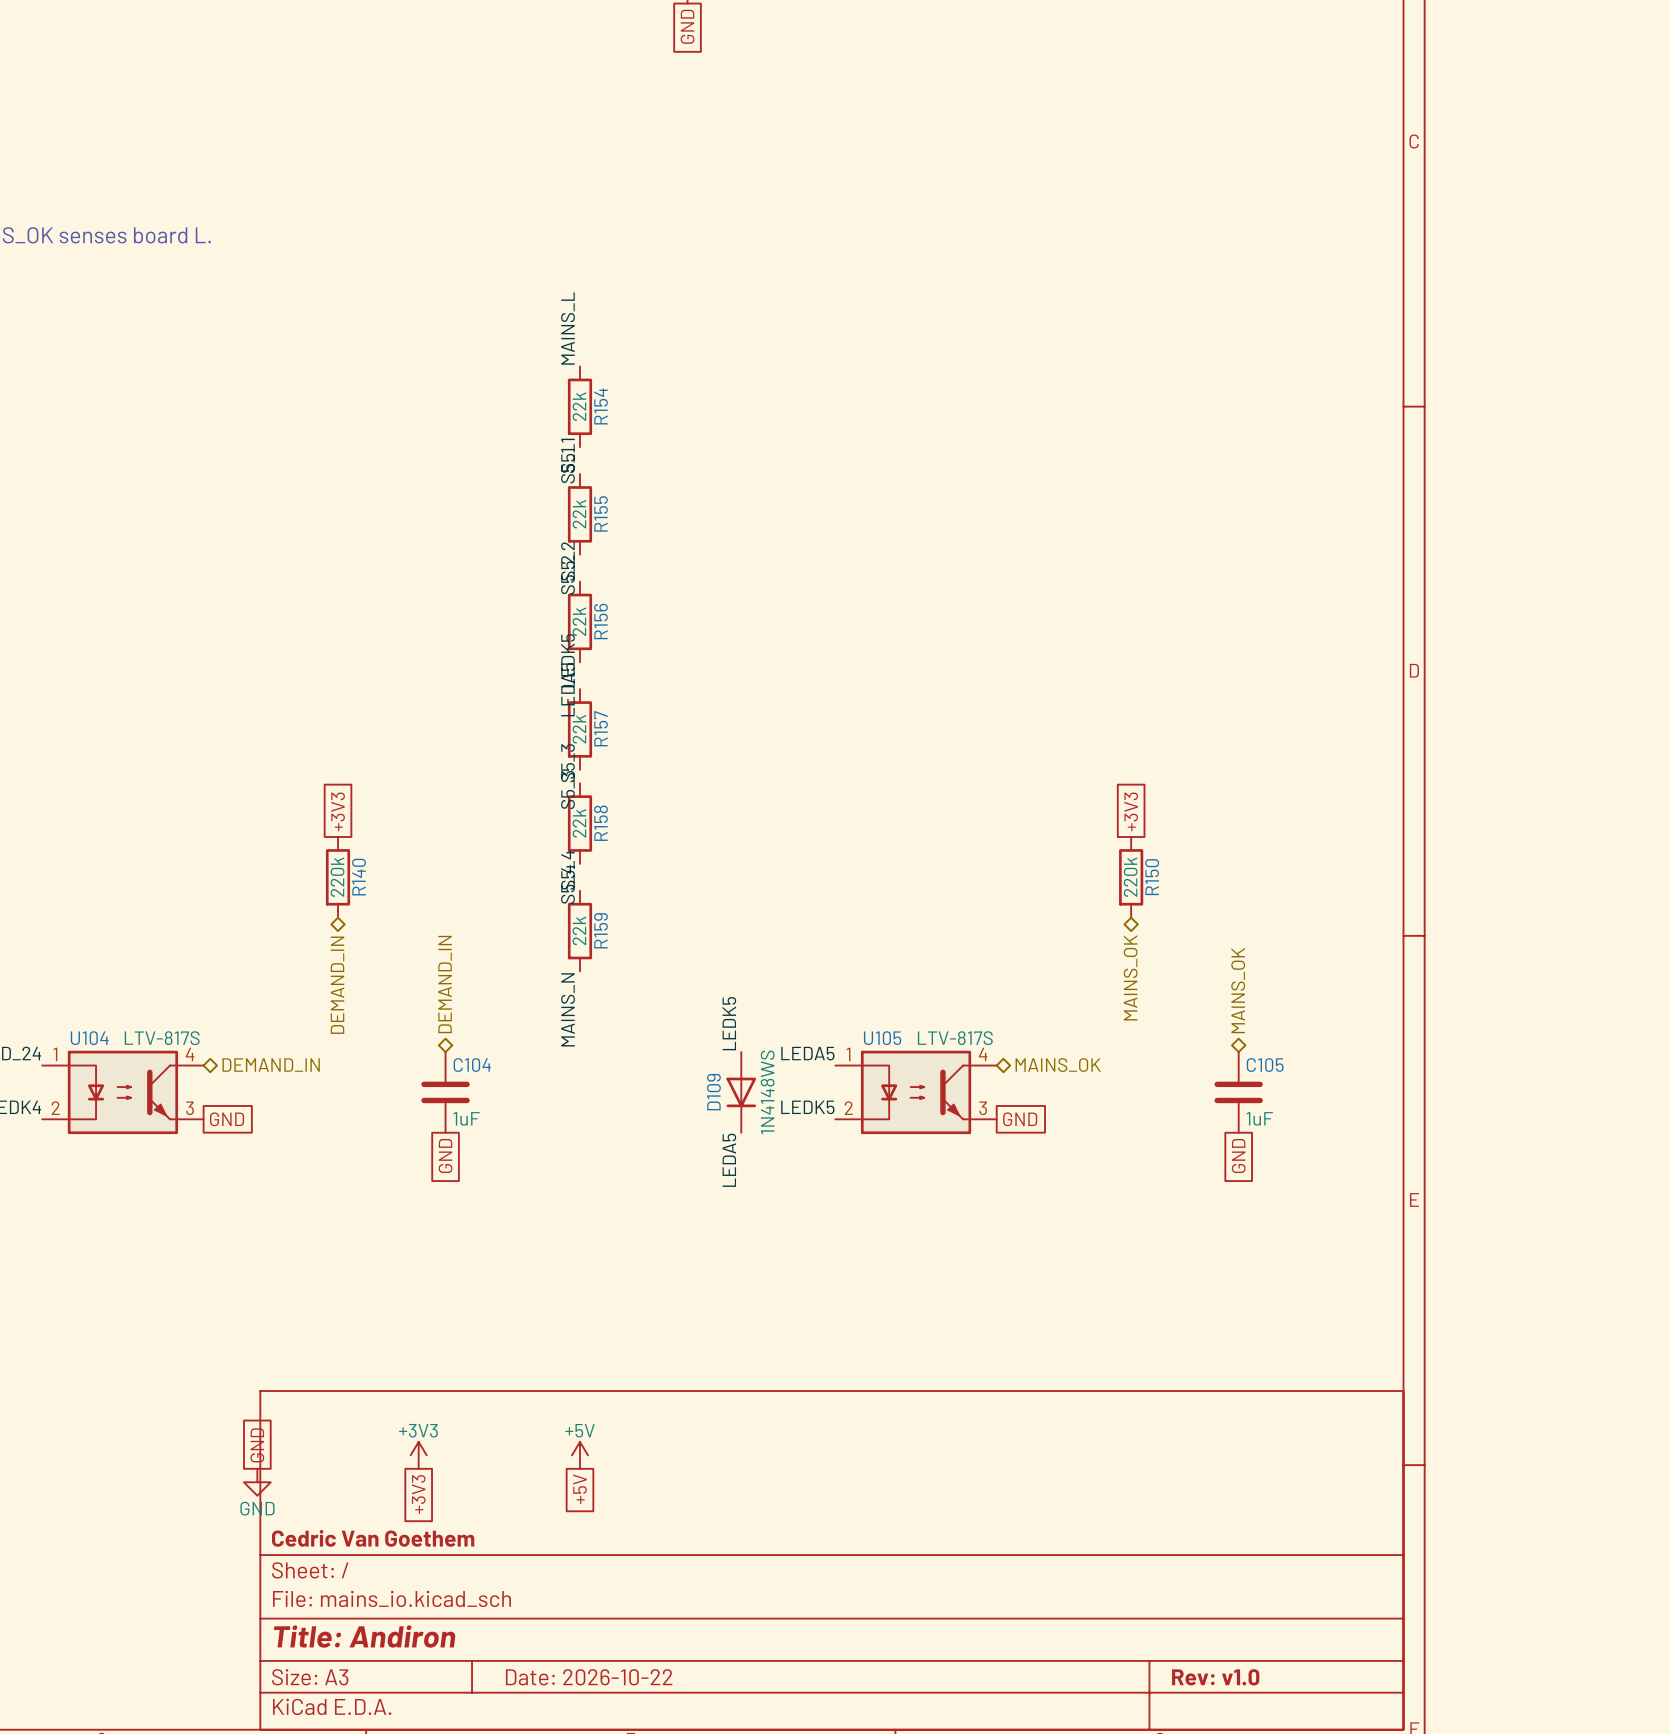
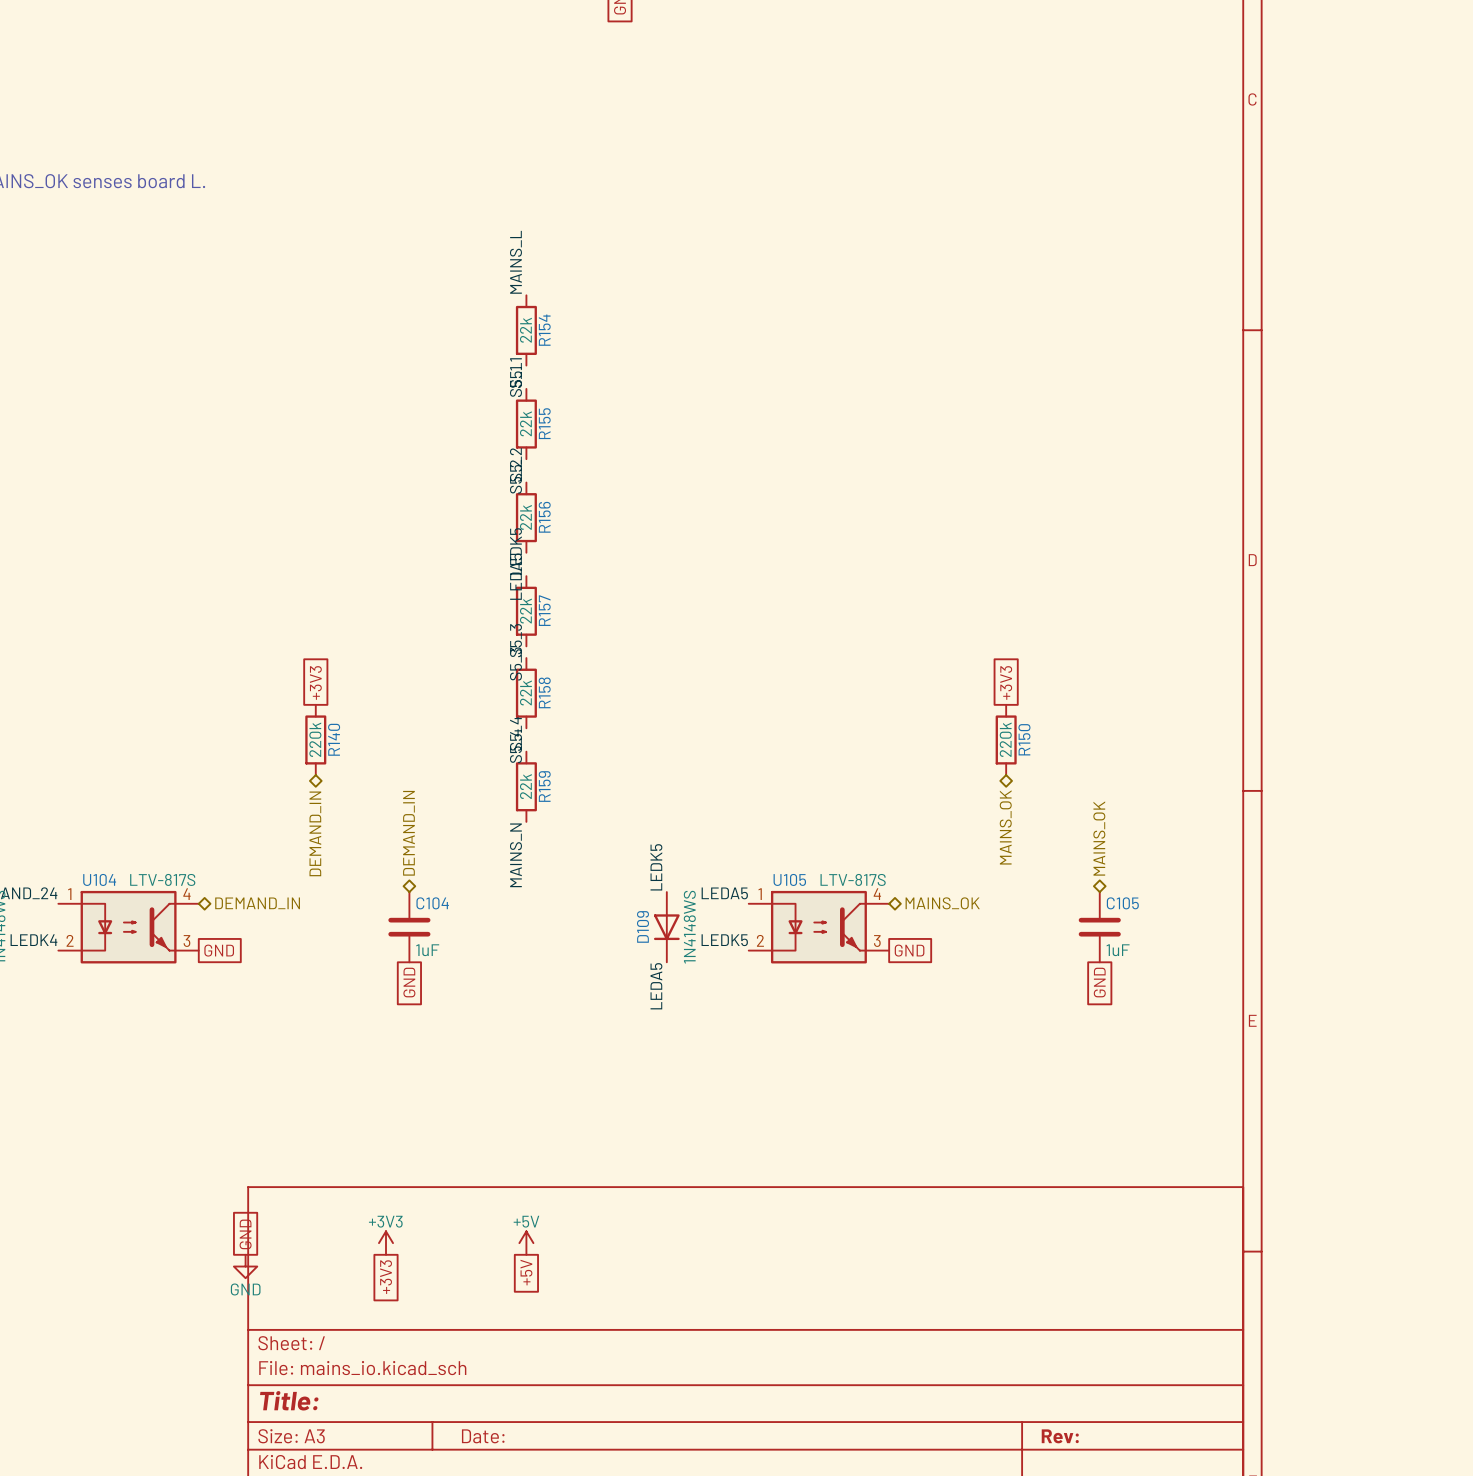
title block: Cedric Van Goethem (373, 1538) -> none
title block: Title: Andiron (364, 1636) -> Title: (289, 1400)
title block: Date: 2026-10-22 (589, 1677) -> Date: (483, 1436)
title block: Rev: v1.0 (1215, 1677) -> Rev: (1060, 1436)

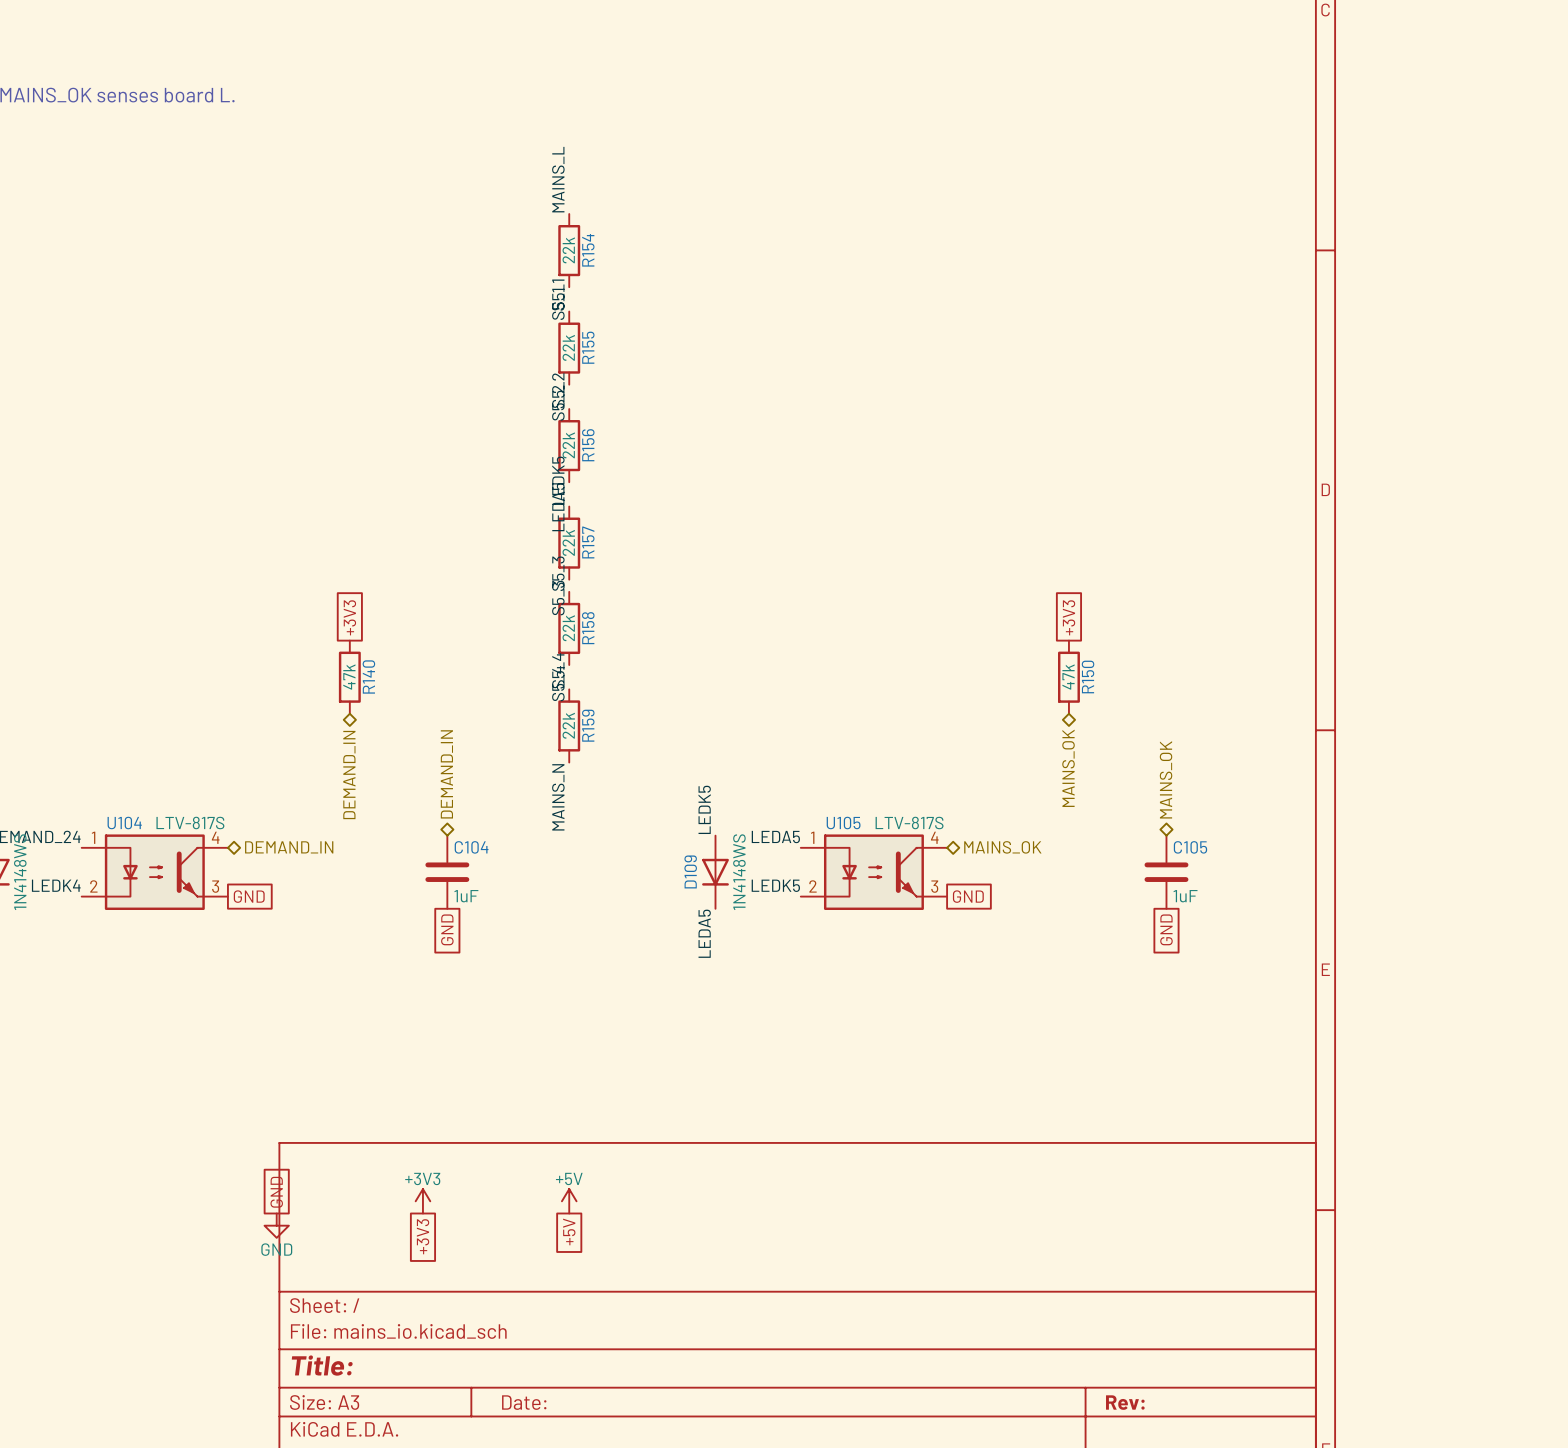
R140 value: 220k (315, 739) -> 47k (349, 677)
R150 value: 220k (1005, 739) -> 47k (1068, 677)

